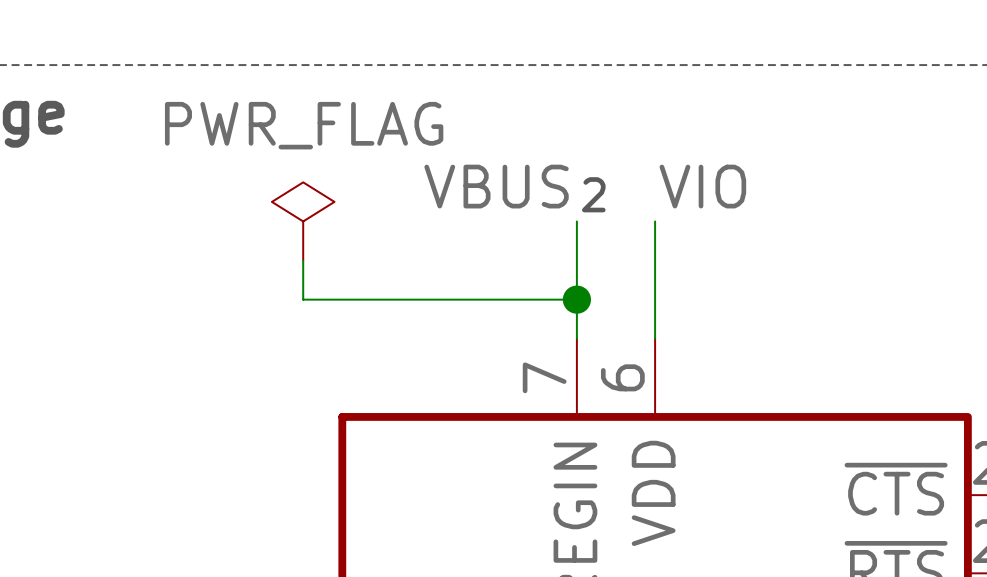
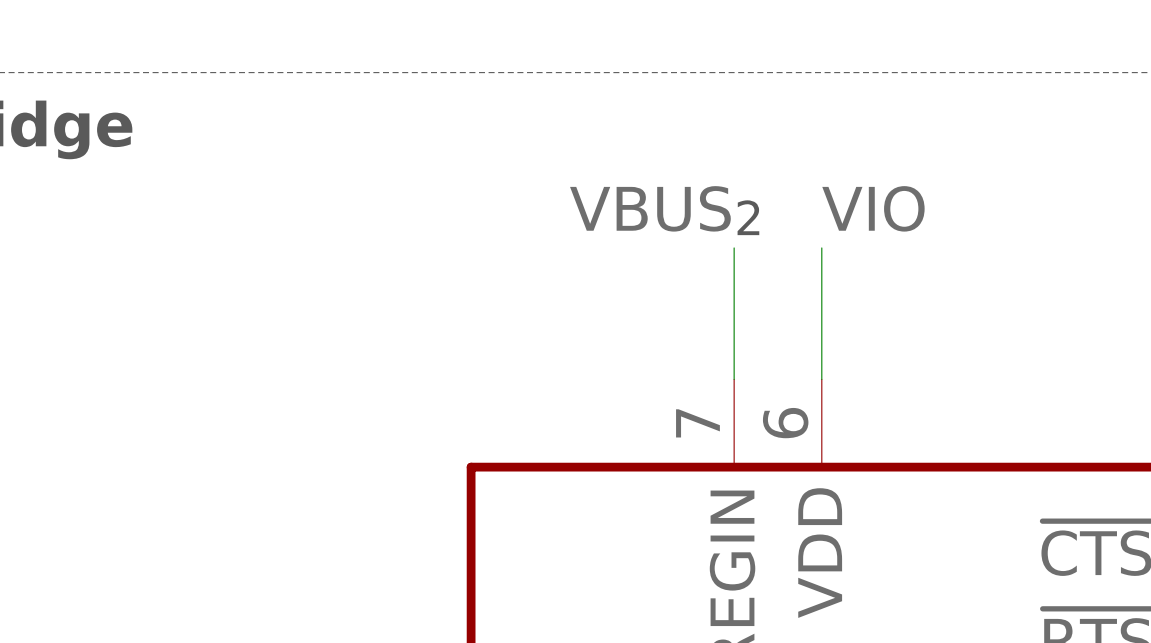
power symbol: PWR_FLAG (303, 221) -> none
wire: (303, 260) (303, 299) (576, 299) -> none
junction: (576, 299) -> none

